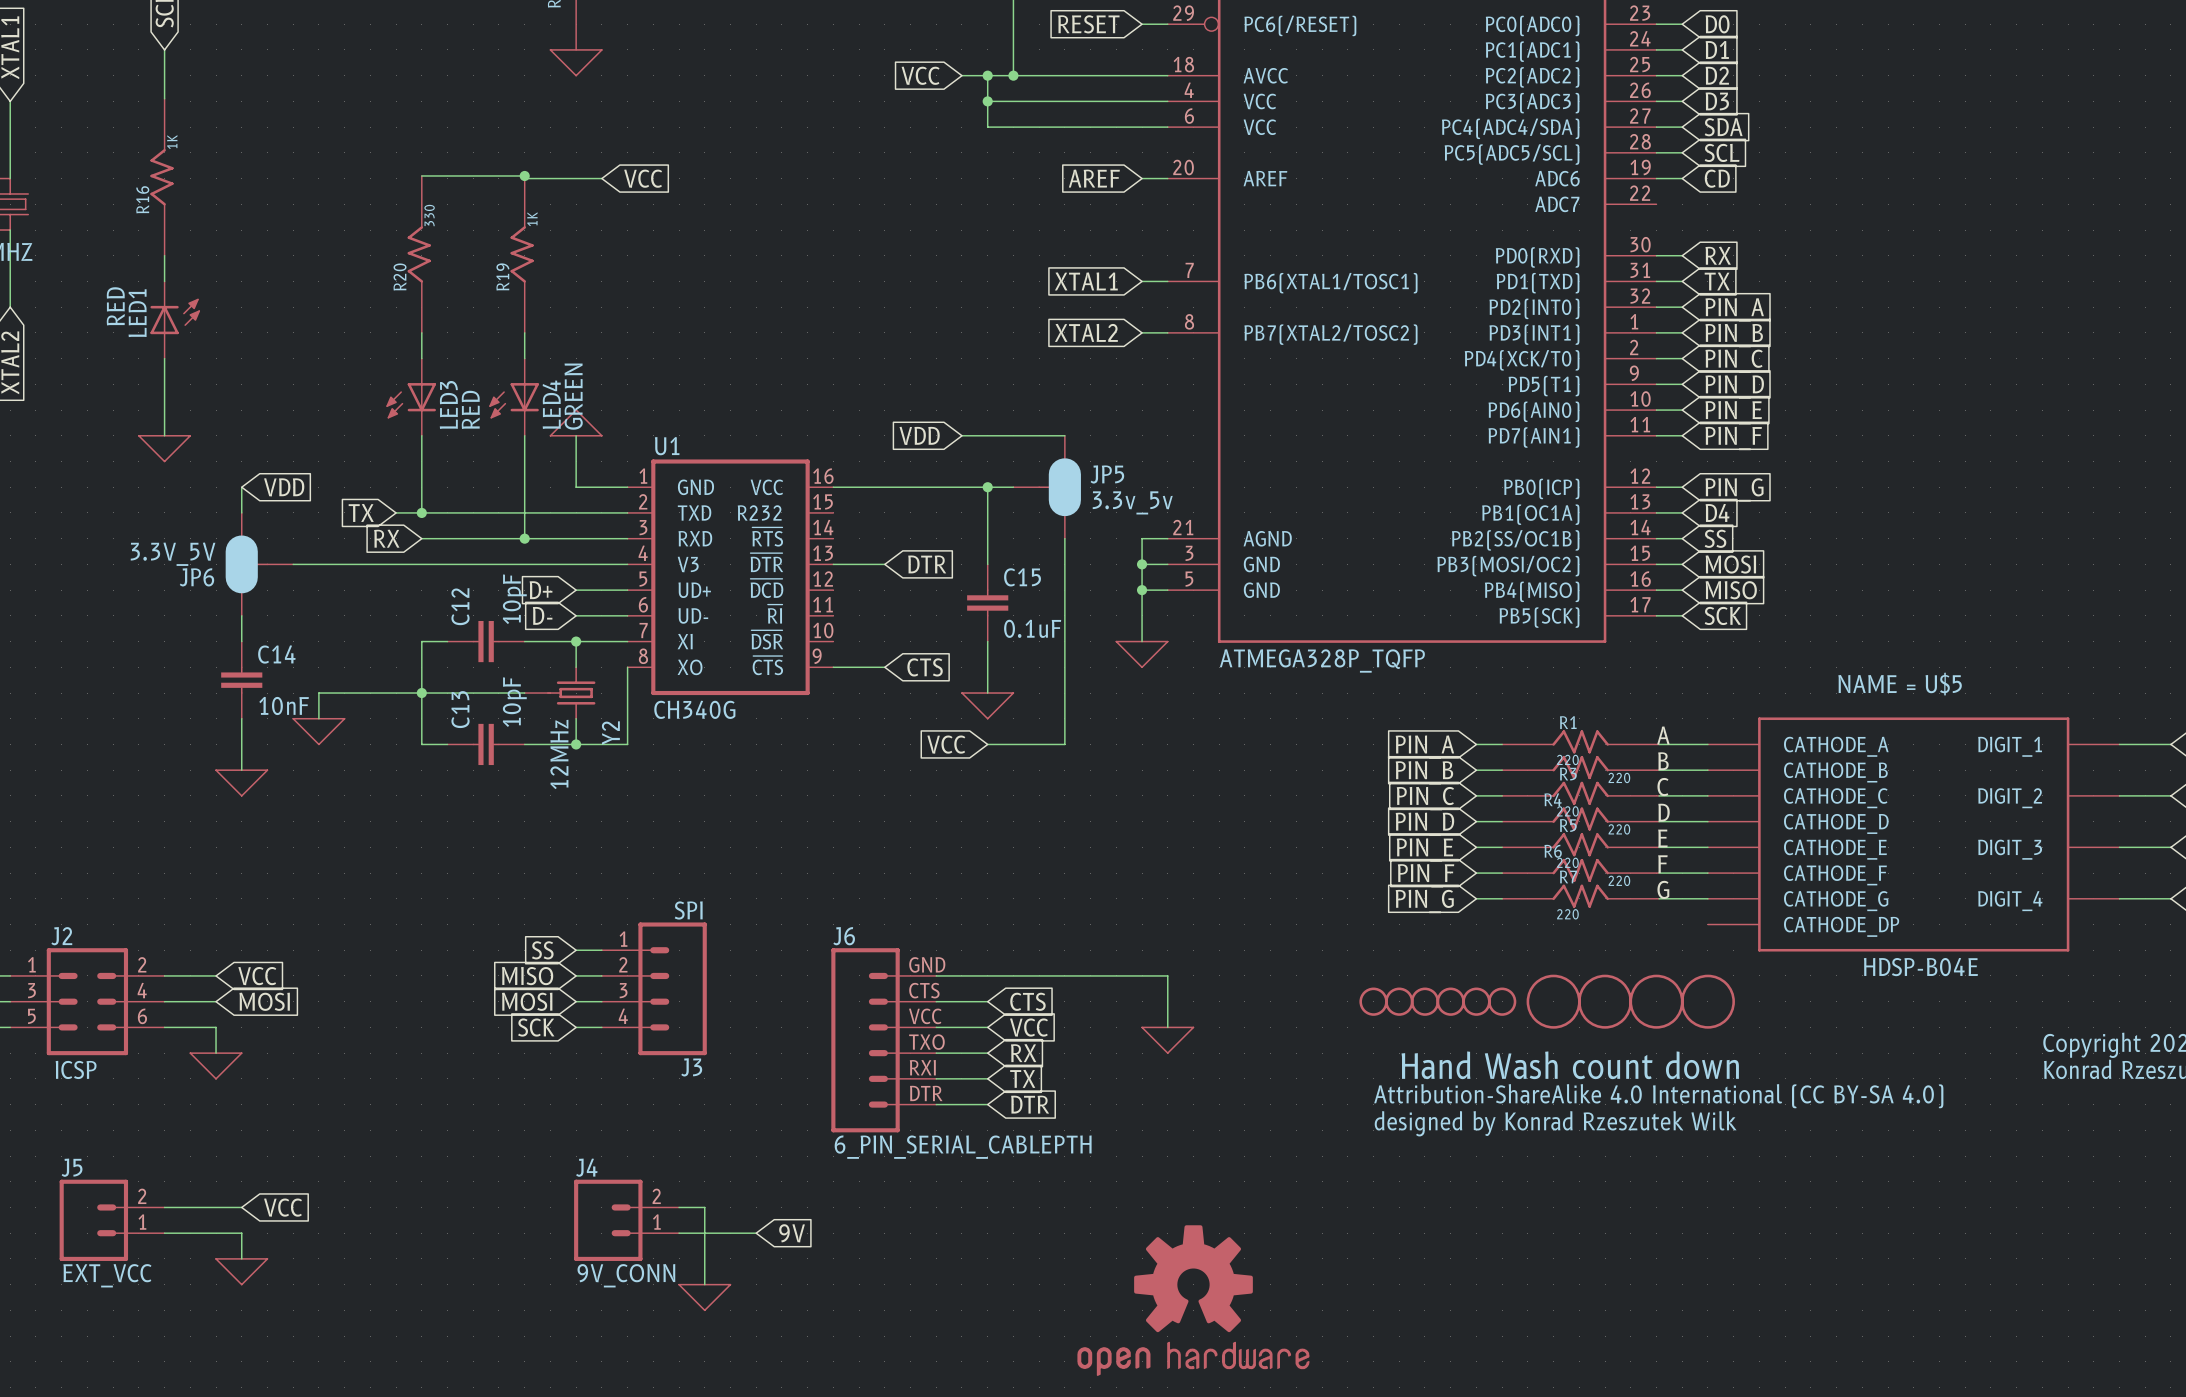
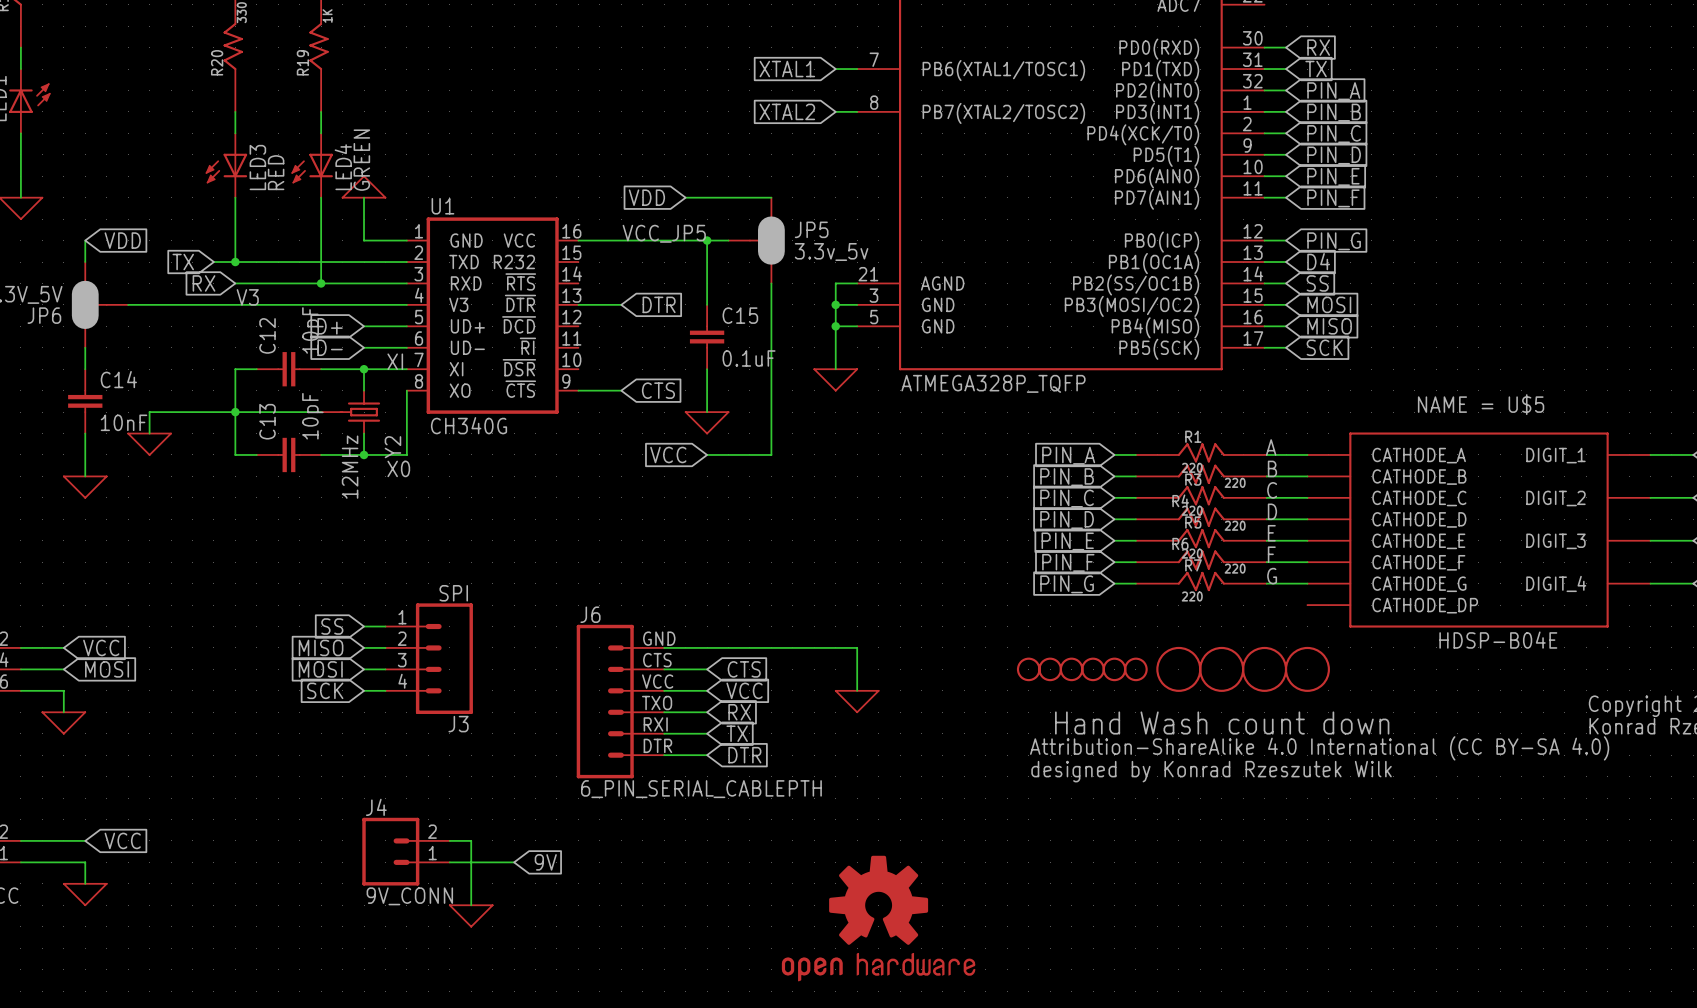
label: none -> VCC_JP5 (664, 233)
label: none -> V3 (247, 297)
label: none -> XI (395, 361)
label: none -> X0 (398, 468)

